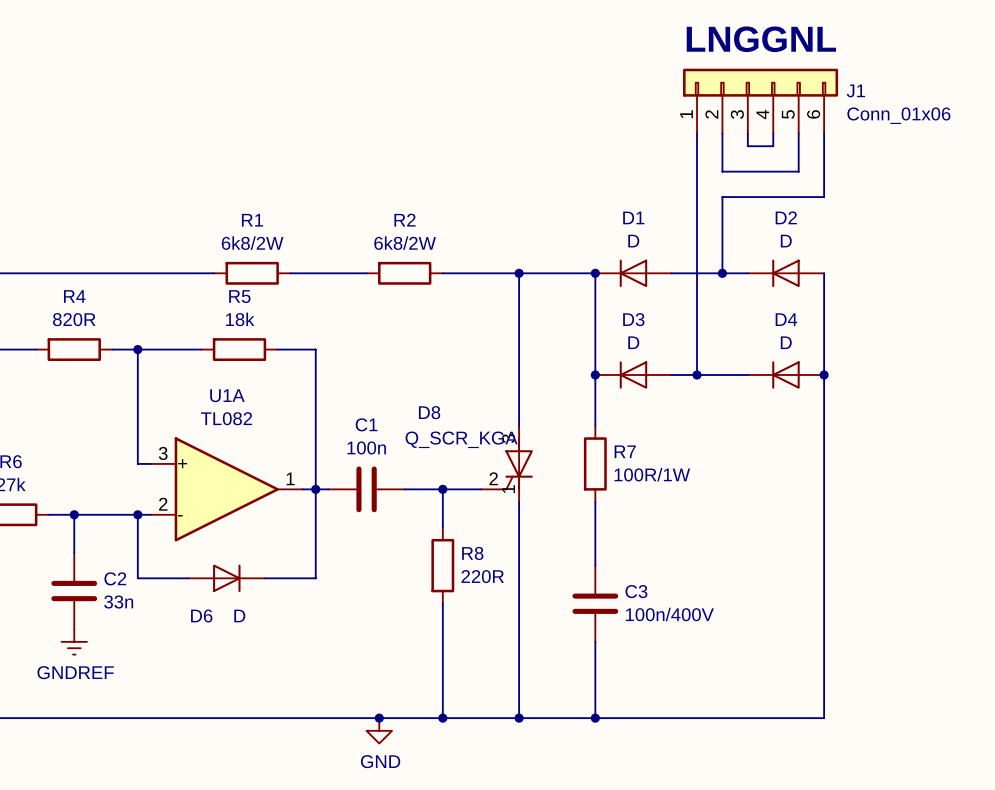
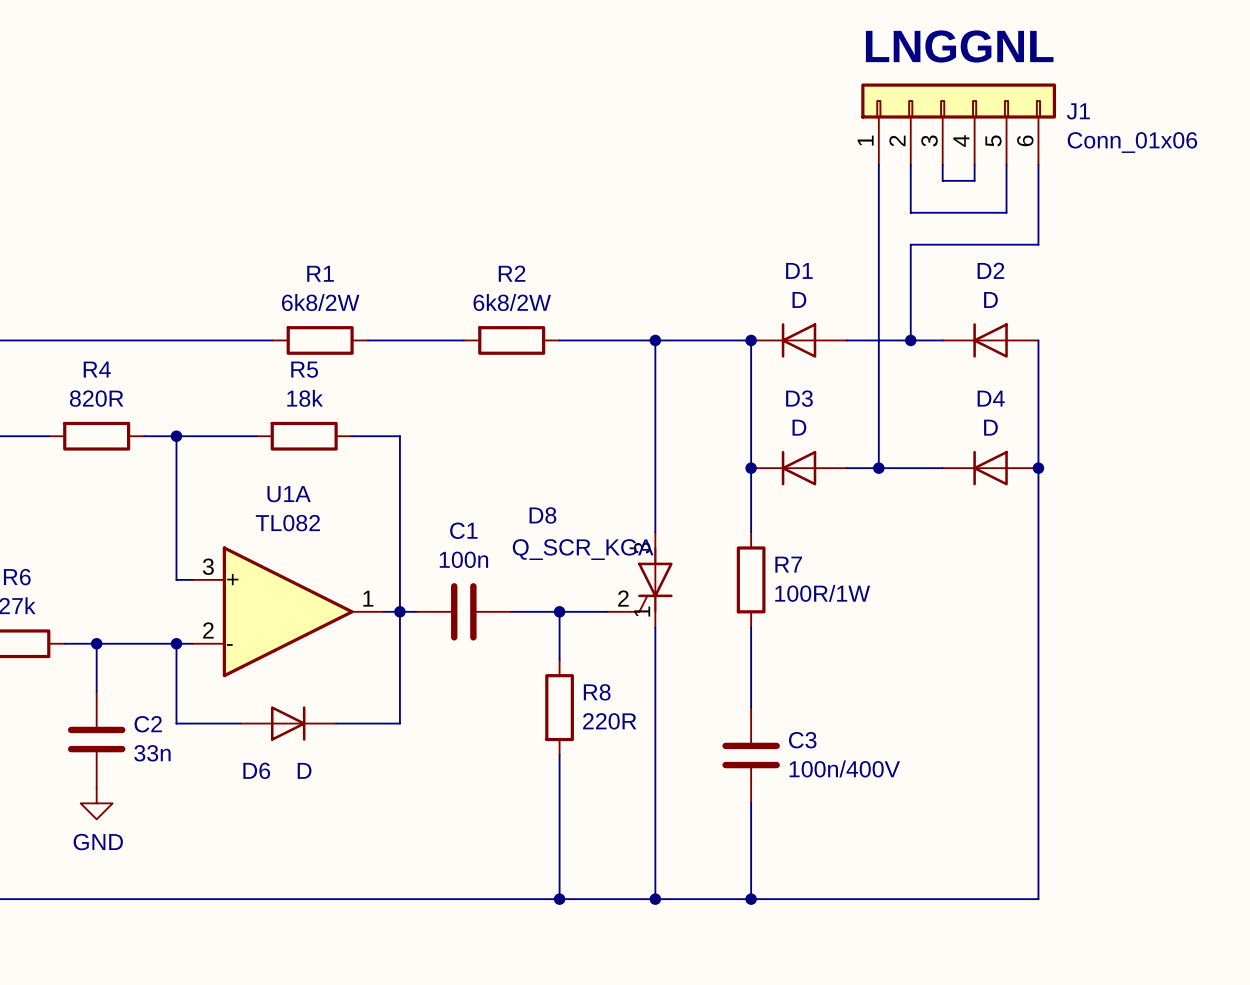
power symbol: GNDREF (74, 641) -> GND (96, 803)
junction: (379, 718) -> none
power symbol: GND (379, 730) -> none

